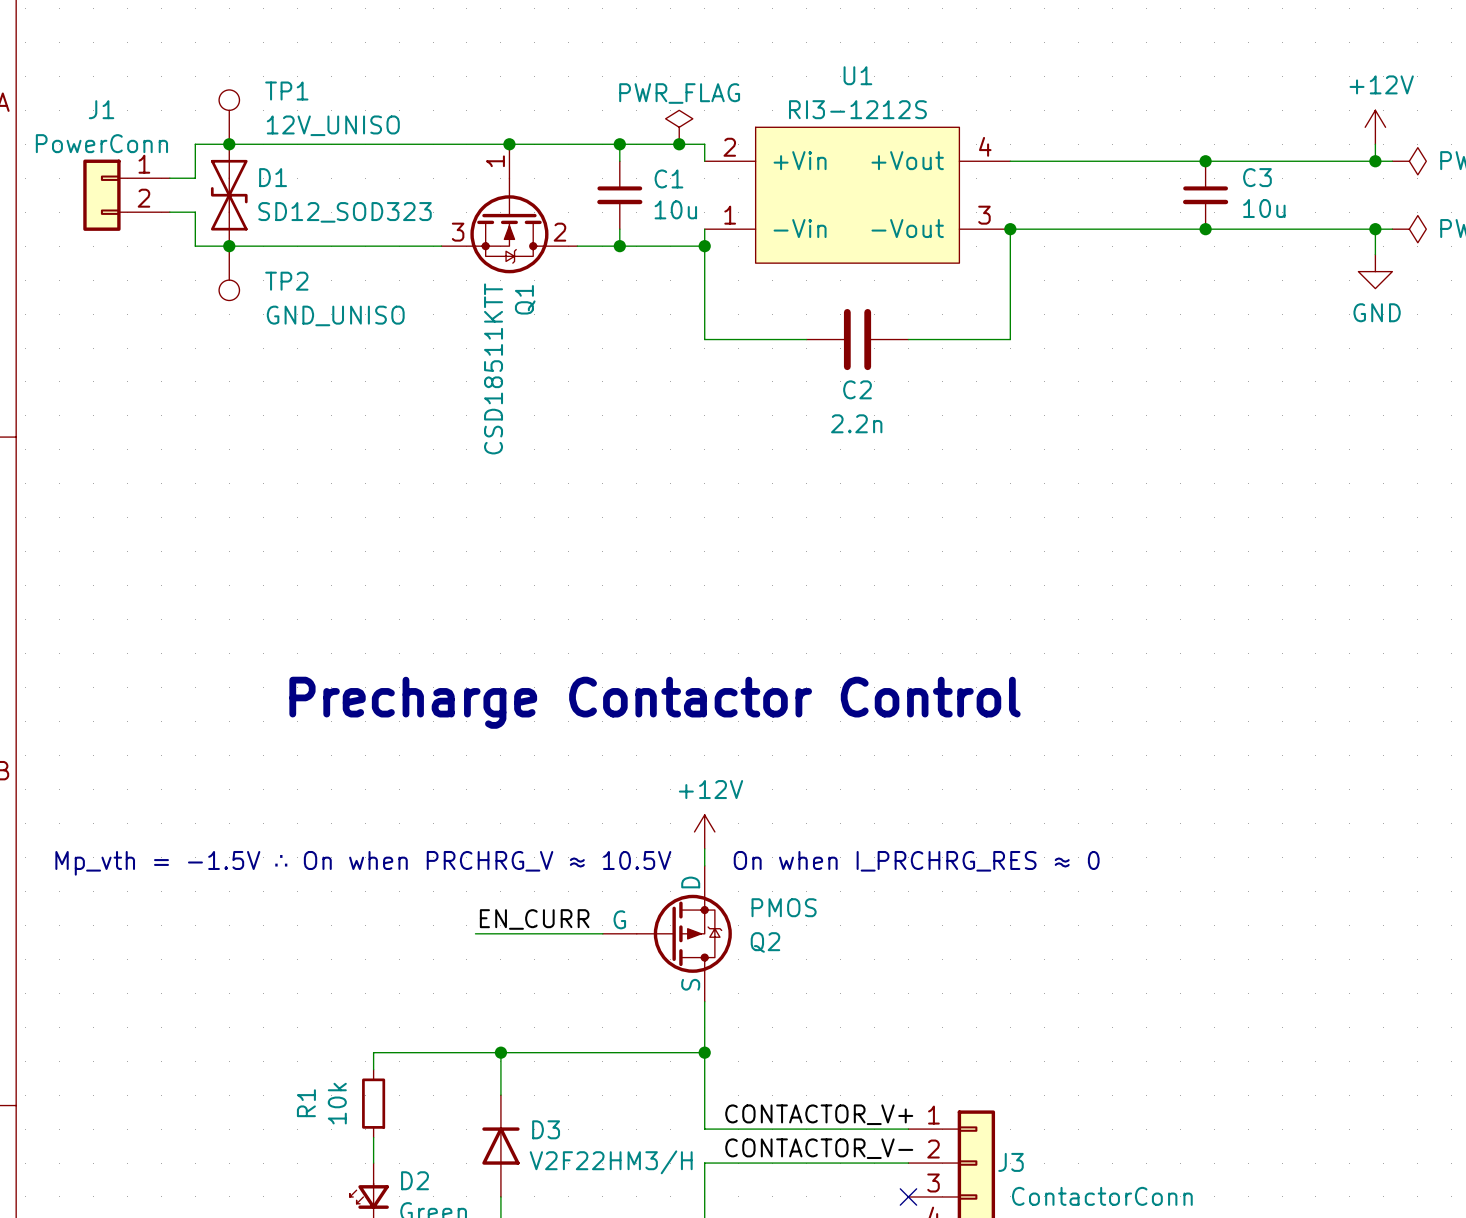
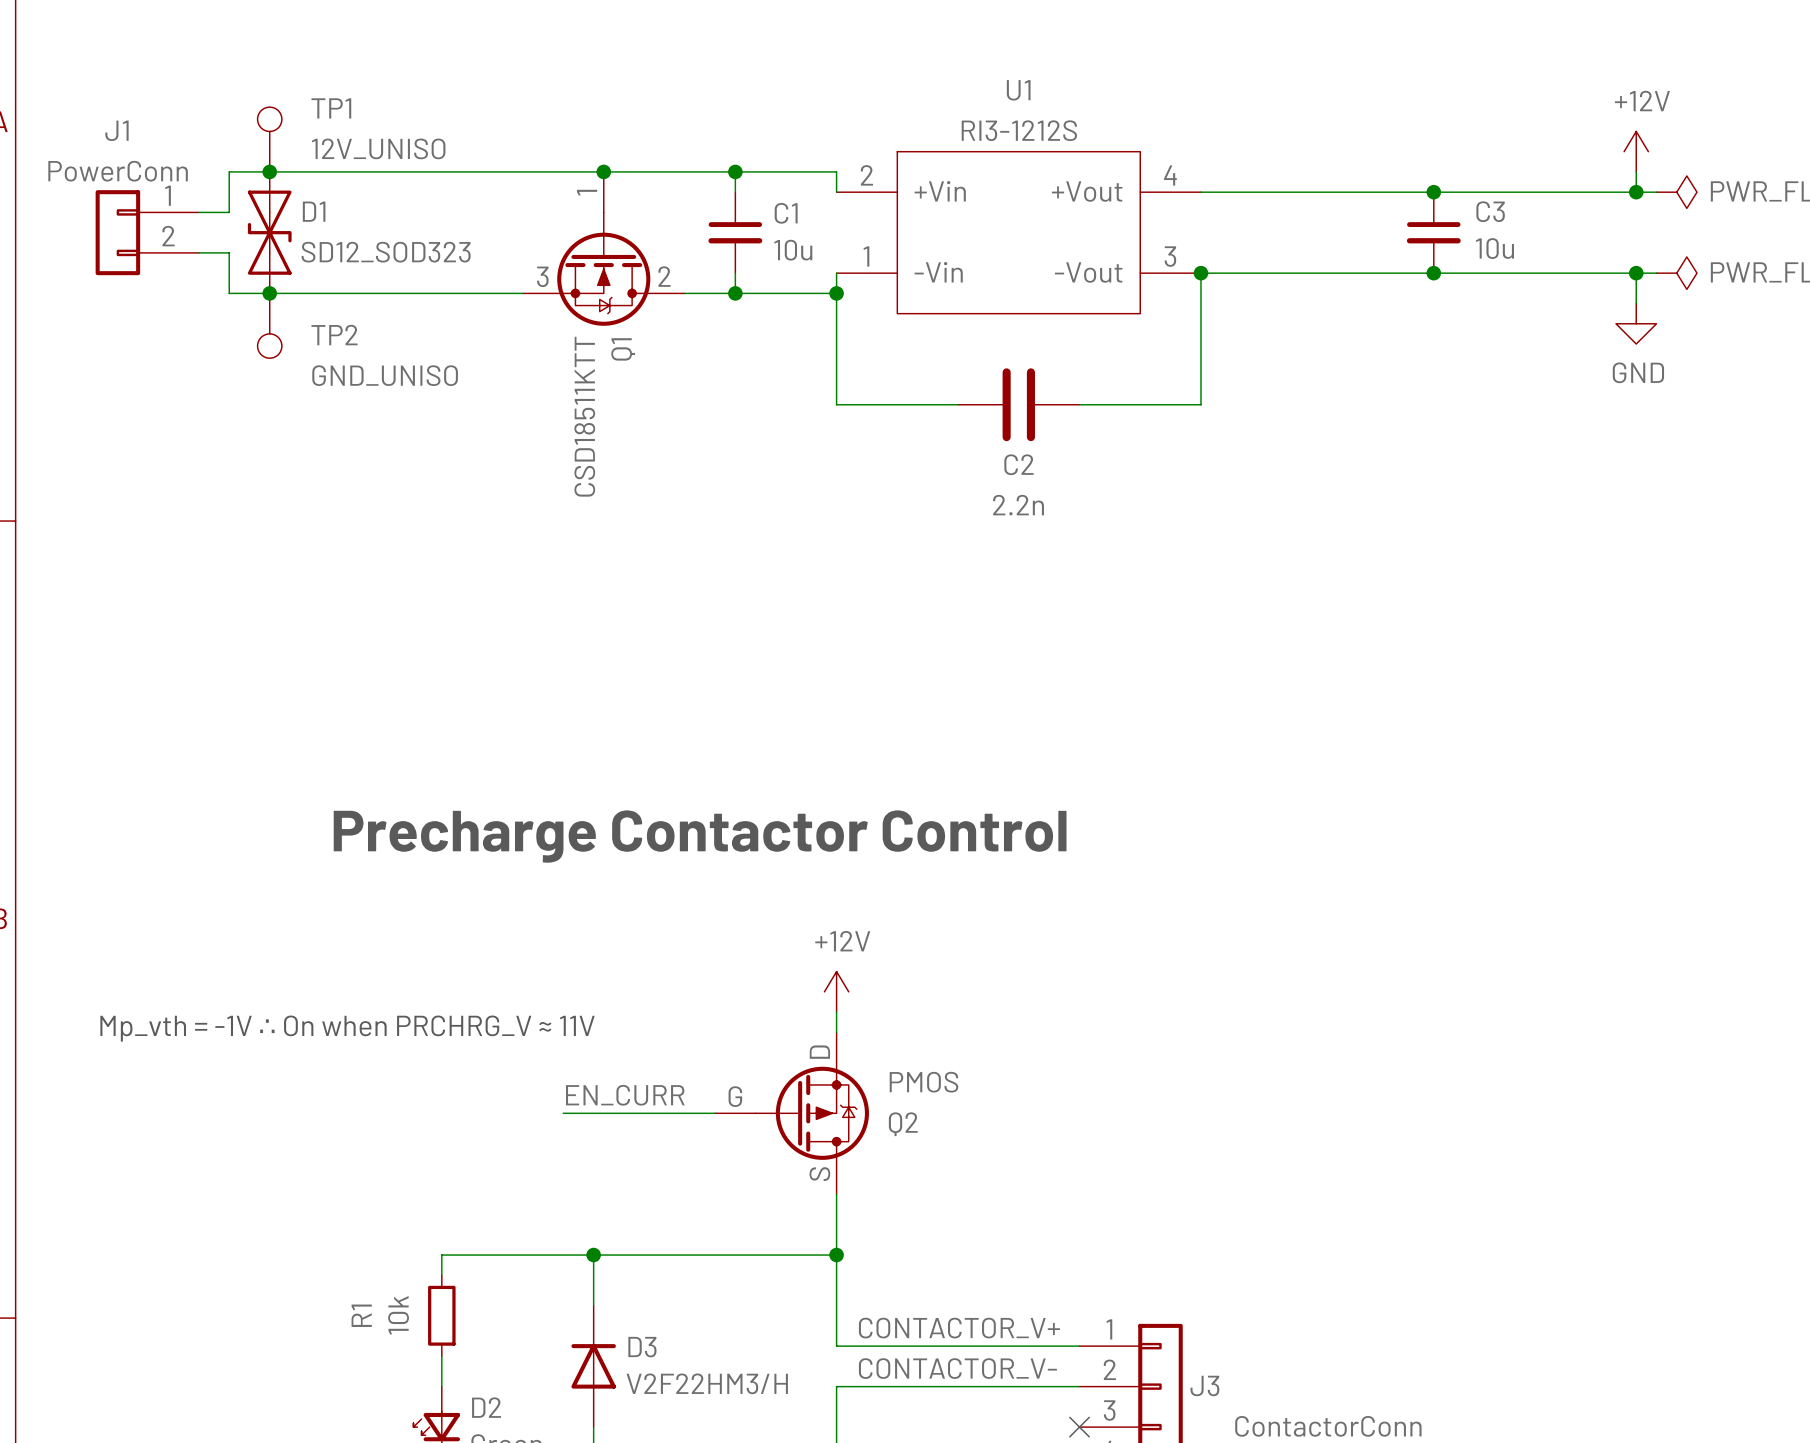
power symbol: PWR_FLAG (679, 127) -> none
junction: (679, 144) -> none
text: On when I_PRCHRG_RES ≈ 0 (916, 861) -> none
text: Mp_vth = -1.5V ∴ On when PRCHRG_V ≈ 10.5V (363, 863) -> Mp_vth = -1V ∴ On when PRCHRG_V ≈ 11V (347, 1028)

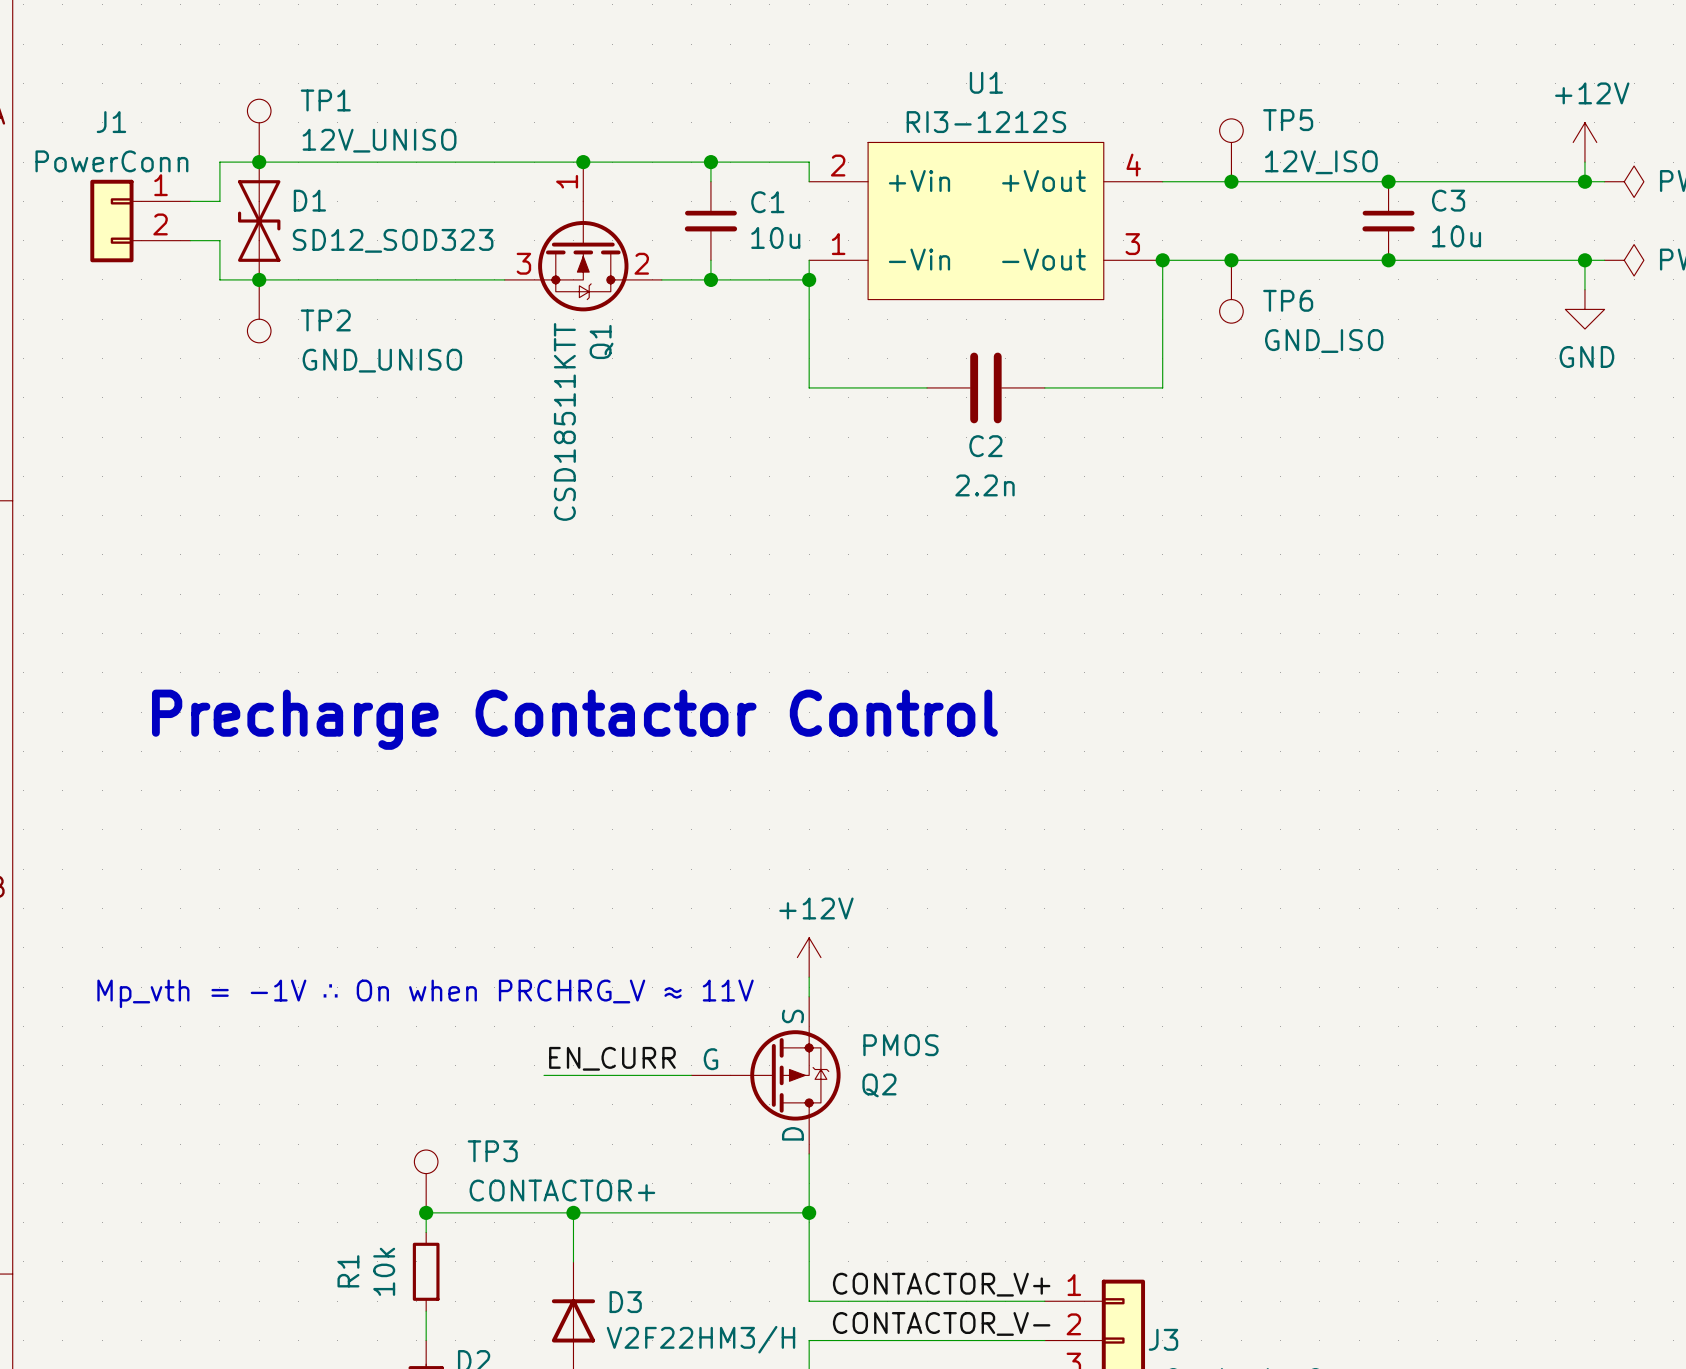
TP5: none -> 12V_ISO (1231, 150)
junction: none -> (1231, 181)
junction: none -> (1231, 260)
TP6: none -> GND_ISO (1231, 291)
text position: Precharge Contactor Control (700, 836) -> Precharge Contactor Control (574, 719)
Q2 pin name: D (819, 1052) -> S (792, 1016)
Q2 pin name: S (819, 1174) -> D (792, 1133)
TP3: none -> CONTACTOR+ (426, 1181)
junction: none -> (426, 1212)

